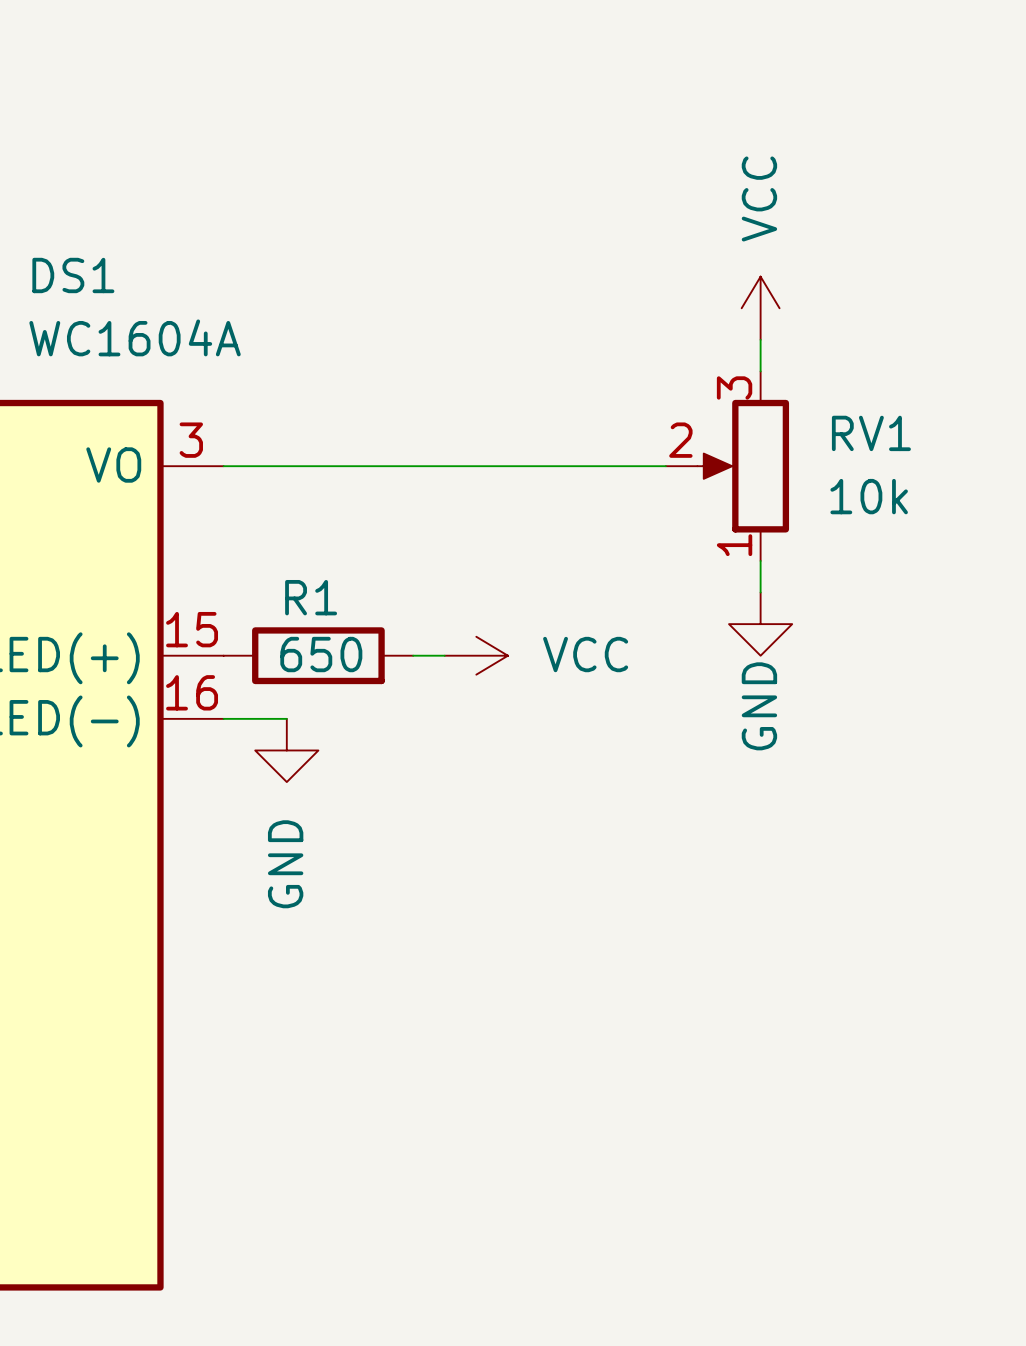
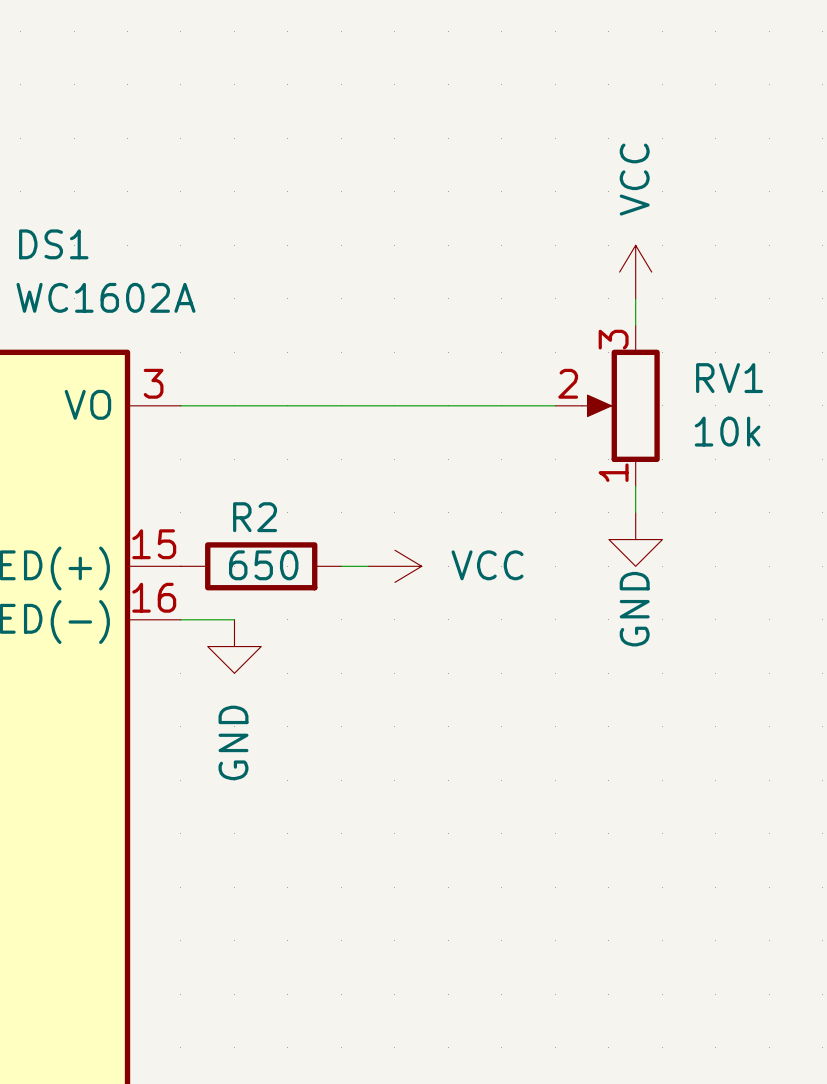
DS1 value: WC1604A (135, 337) -> WC1602A (105, 297)
R1 name: R1 (311, 597) -> R2 (255, 517)

